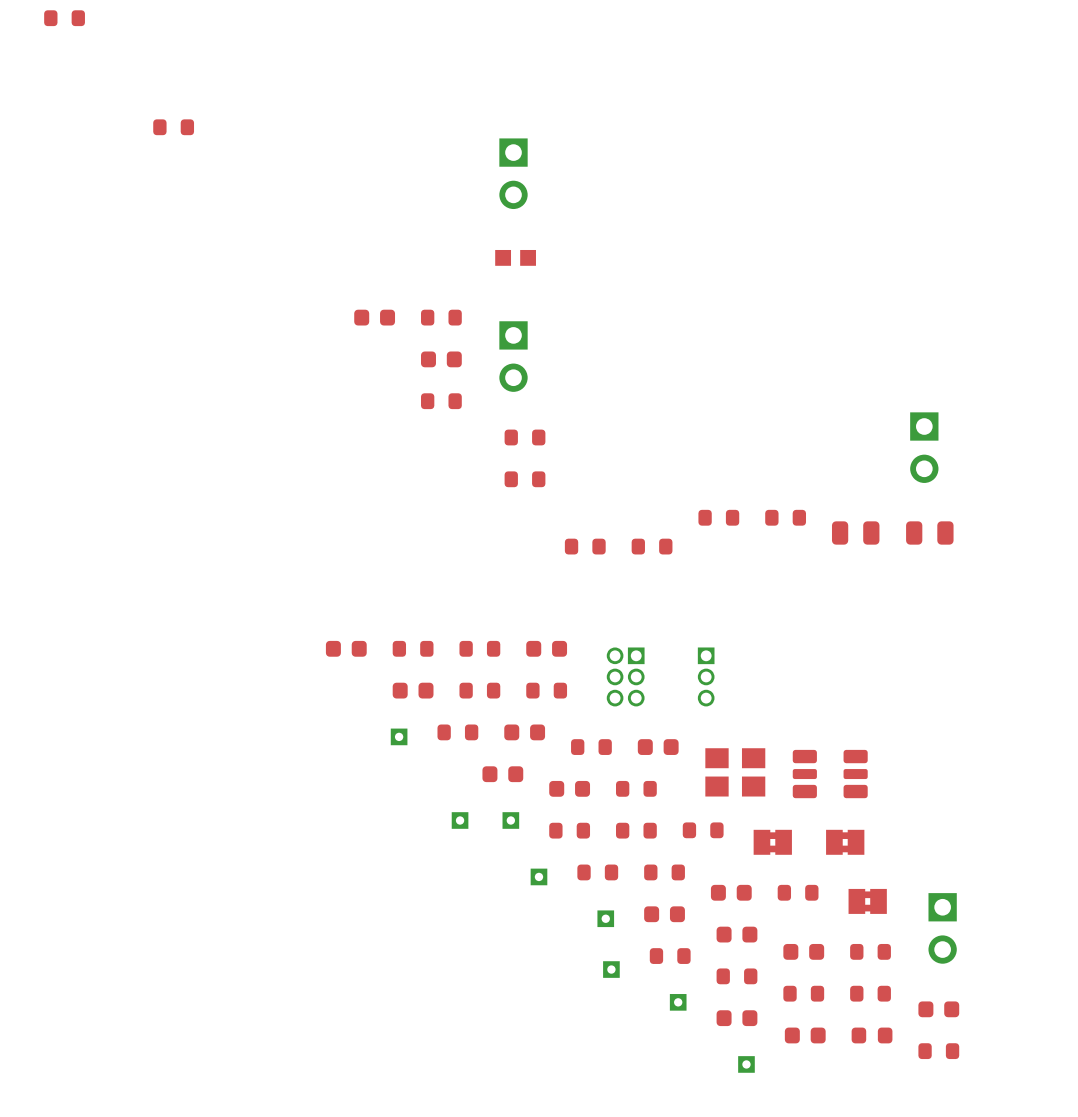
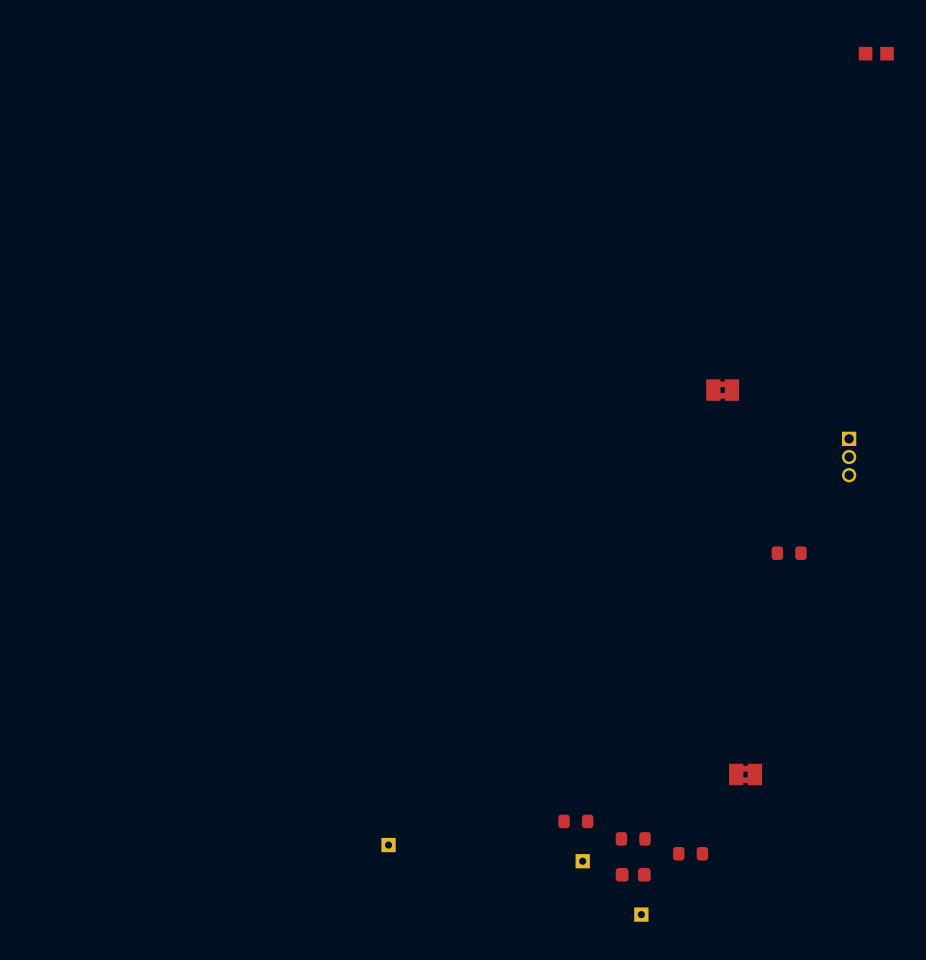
part: (64, 18) -> none
part: none -> (876, 53)
part: (173, 127) -> none
part: (513, 173) -> none
part: (515, 257) -> none
part: (374, 317) -> none
part: (441, 317) -> none
part: (513, 356) -> none
part: (441, 359) -> none
part: (441, 401) -> none
part: (524, 437) -> none
part: (924, 447) -> none
part: none -> (722, 390)
part: (524, 479) -> none
part: (718, 517) -> none
part: (785, 517) -> none
part: (855, 532) -> none
part: (929, 532) -> none
part: (585, 546) -> none
part: (652, 546) -> none
part: none -> (789, 553)
part: (346, 648) -> none
part: (413, 648) -> none
part: (479, 648) -> none
part: (546, 648) -> none
part: (625, 676) -> none
part position: (706, 676) -> (849, 457)
part: (413, 690) -> none
part: (479, 690) -> none
part: (546, 690) -> none
part: (457, 732) -> none
part: (524, 732) -> none
part: (399, 736) -> none
part: (591, 747) -> none
part: (658, 747) -> none
part: (735, 772) -> none
part: (502, 774) -> none
part: (830, 774) -> none
part: (569, 788) -> none
part: (636, 788) -> none
part: (460, 820) -> none
part: (510, 820) -> none
part: (569, 830) -> none
part: (636, 830) -> none
part: (703, 830) -> none
part: (772, 842) -> none
part: (845, 842) -> none
part: (597, 872) -> none
part: (664, 872) -> none
part: (538, 876) -> none
part: (731, 892) -> none
part: (798, 892) -> none
part: (664, 914) -> none
part: (605, 918) -> none
part: (942, 928) -> none
part: (736, 934) -> none
part: (803, 951) -> none
part: (870, 951) -> none
part: (611, 969) -> none
part: none -> (388, 845)
part: (870, 993) -> none
part: (938, 1009) -> none
part: (805, 1035) -> none
part: (872, 1035) -> none
part: (938, 1051) -> none

